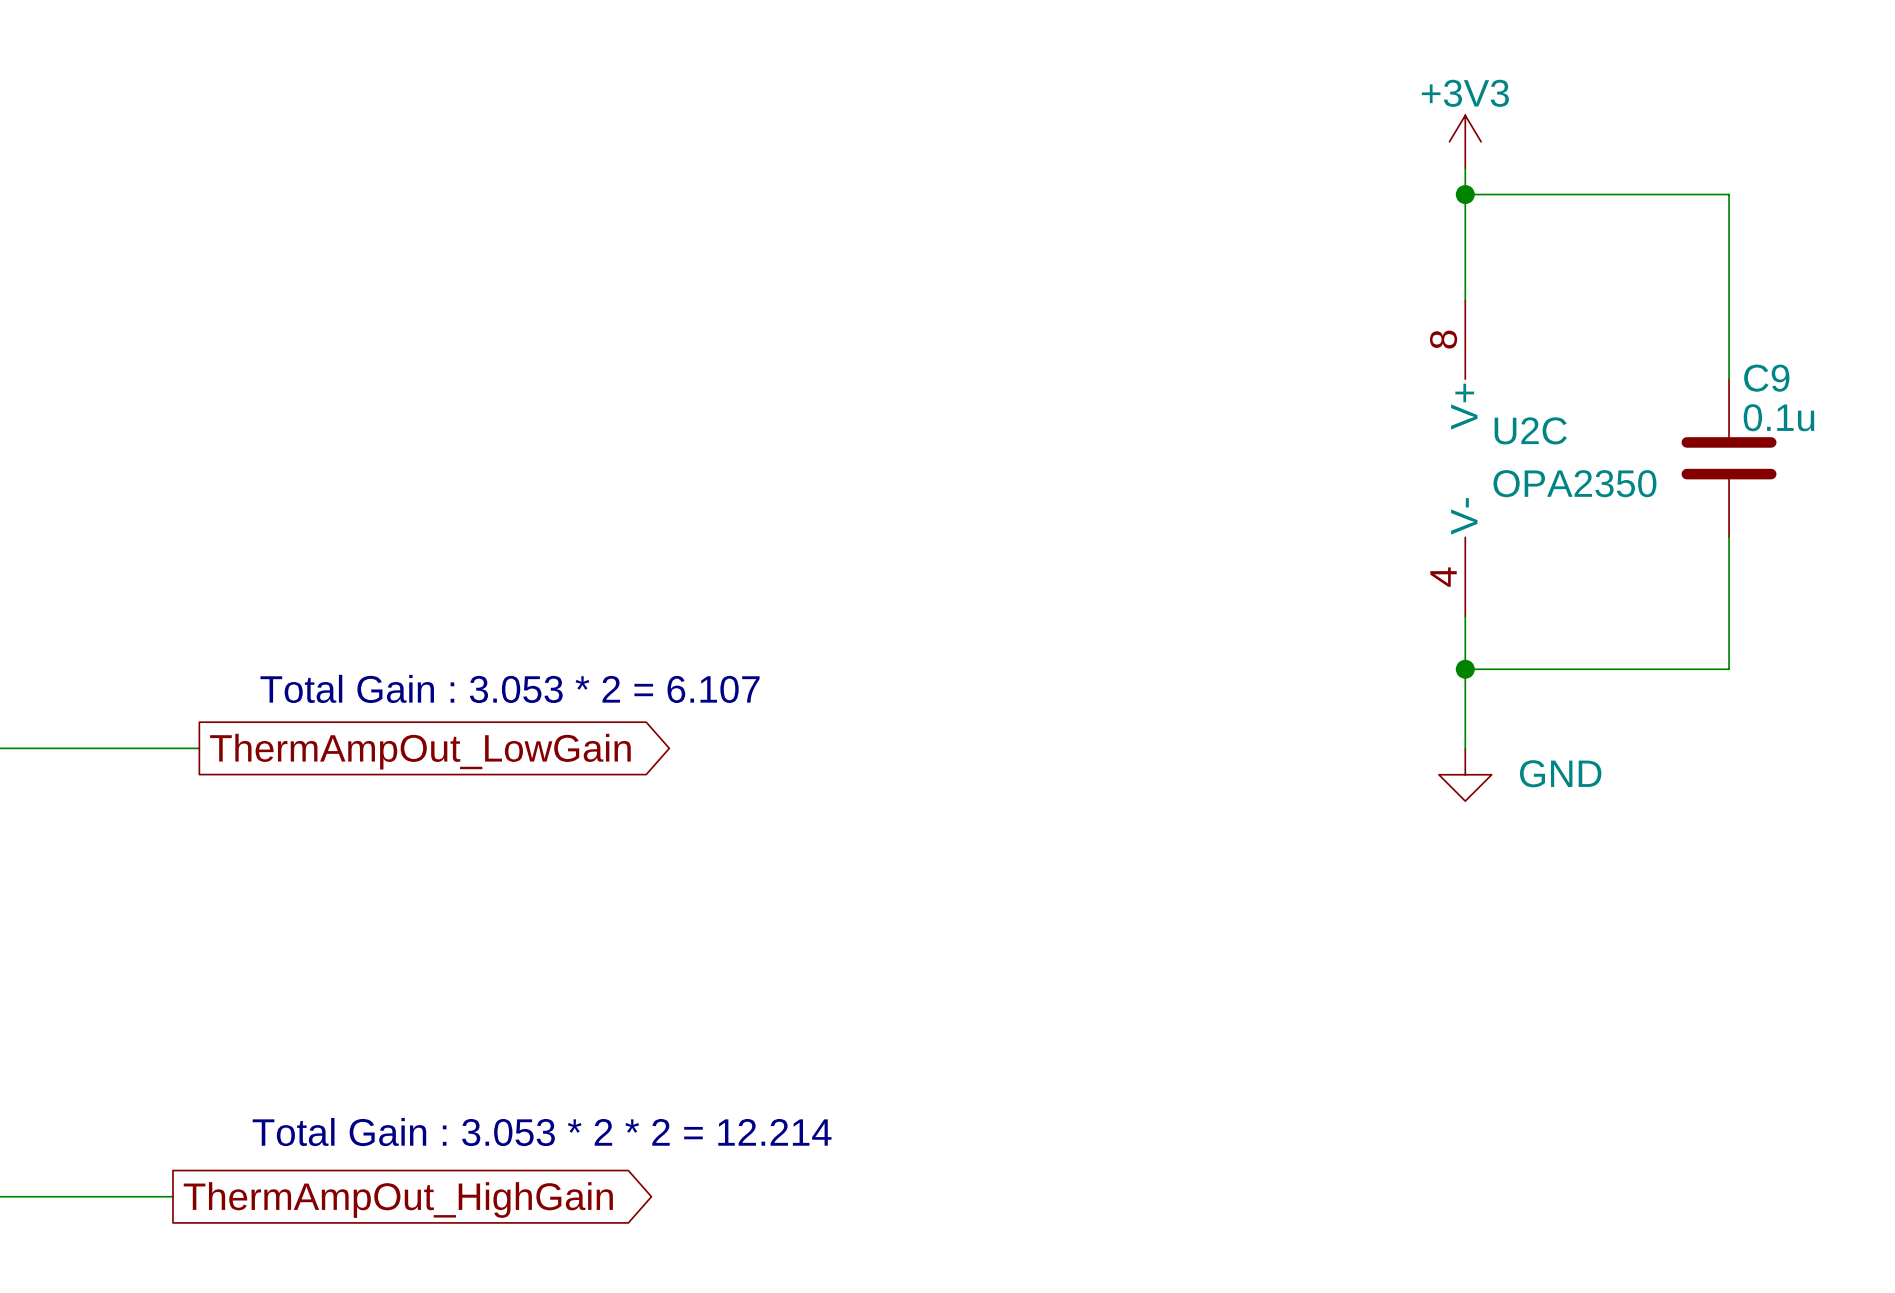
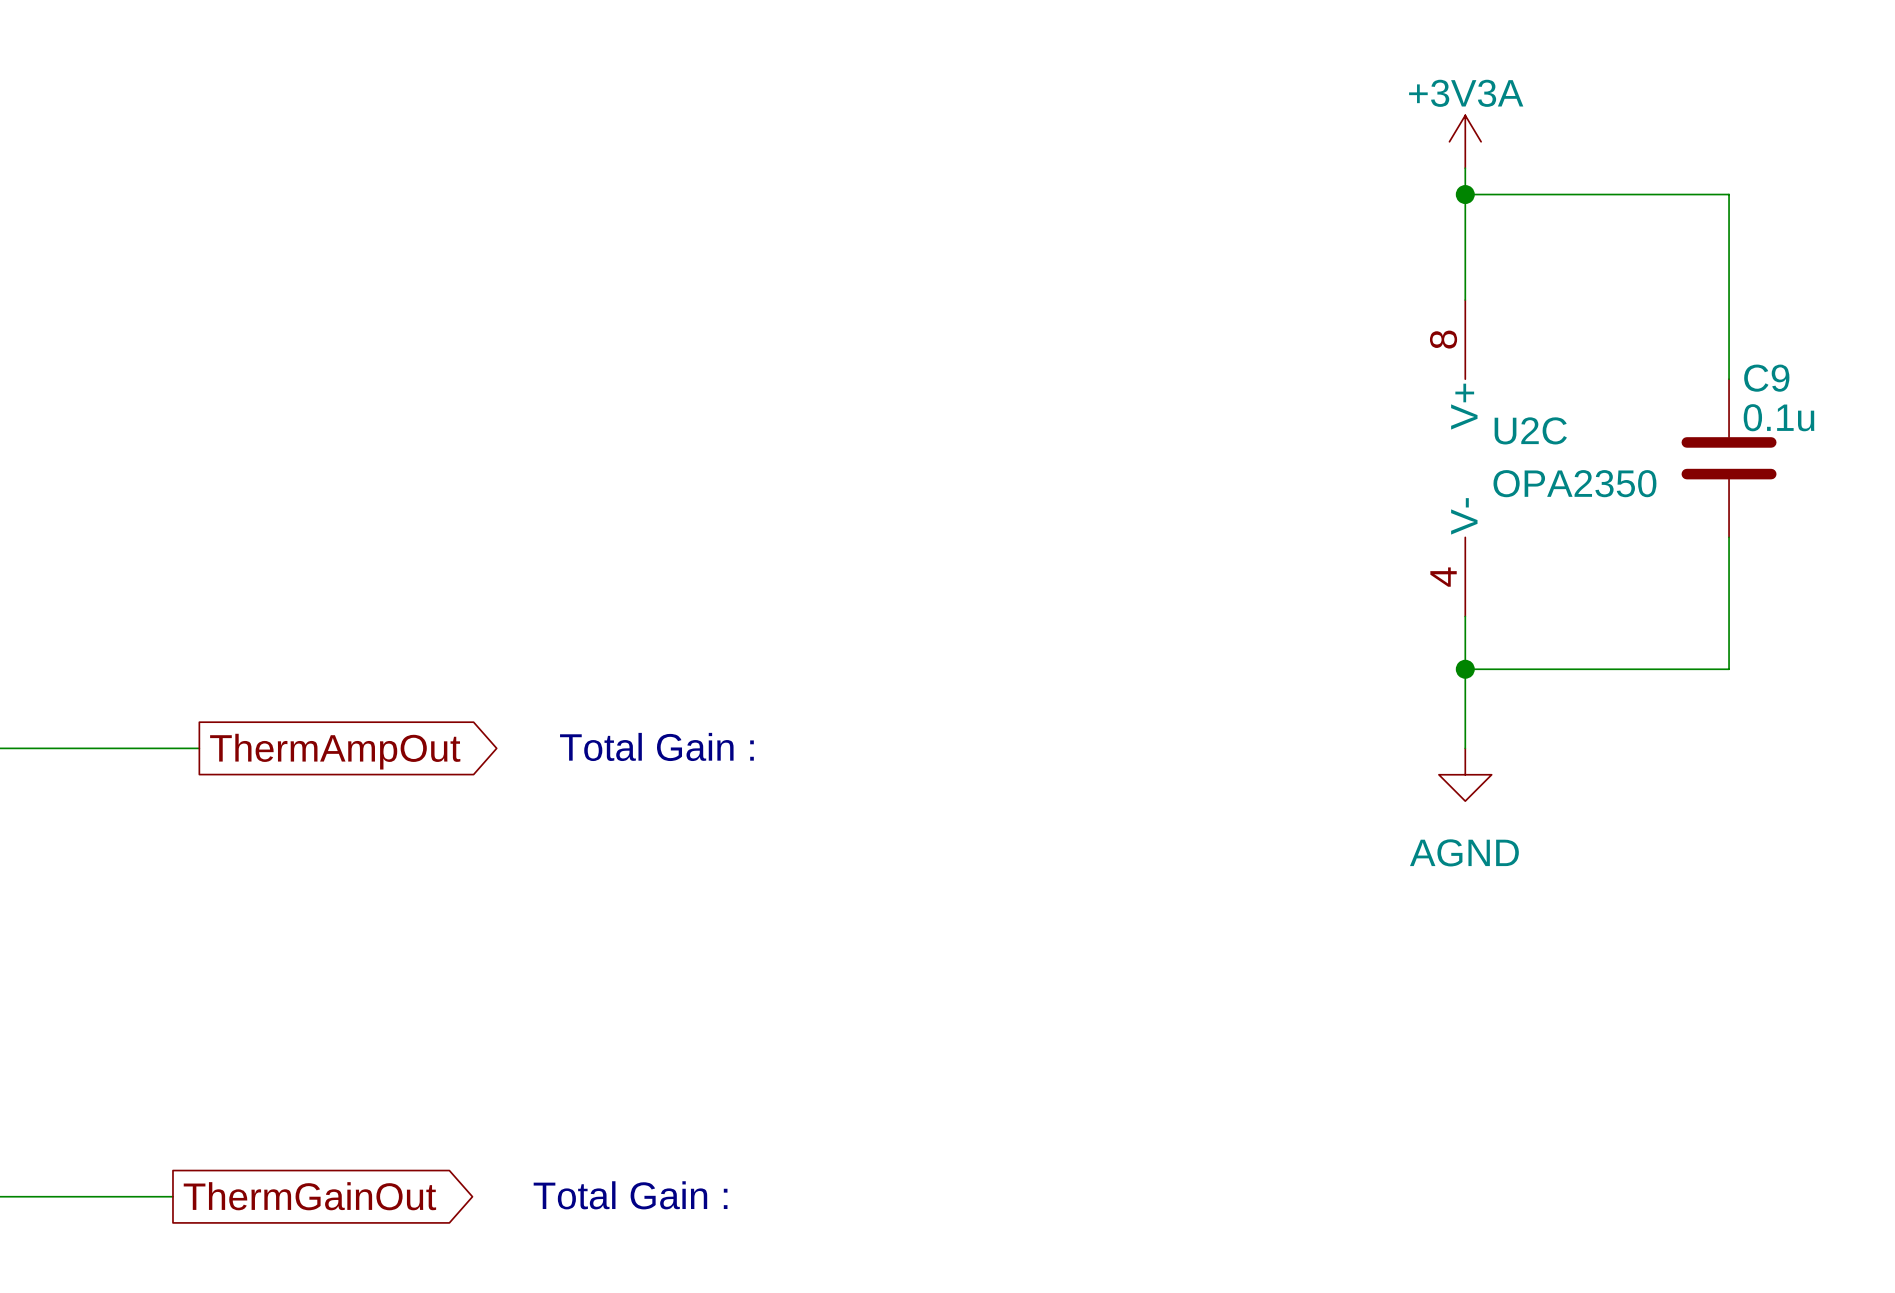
power symbol: +3V3 (1465, 141) -> +3V3A (1465, 141)
text: Total Gain : 3.053 * 2 = 6.107 (510, 688) -> none
text: none -> Total Gain : (656, 746)
global label: ThermAmpOut_LowGain (420, 751) -> ThermAmpOut (335, 751)
power symbol: GND (1465, 774) -> AGND (1465, 774)
text: Total Gain : 3.053 * 2 * 2 = 12.214 (542, 1132) -> none
text: none -> Total Gain : (630, 1195)
global label: ThermAmpOut_HighGain (398, 1200) -> ThermGainOut (309, 1196)

